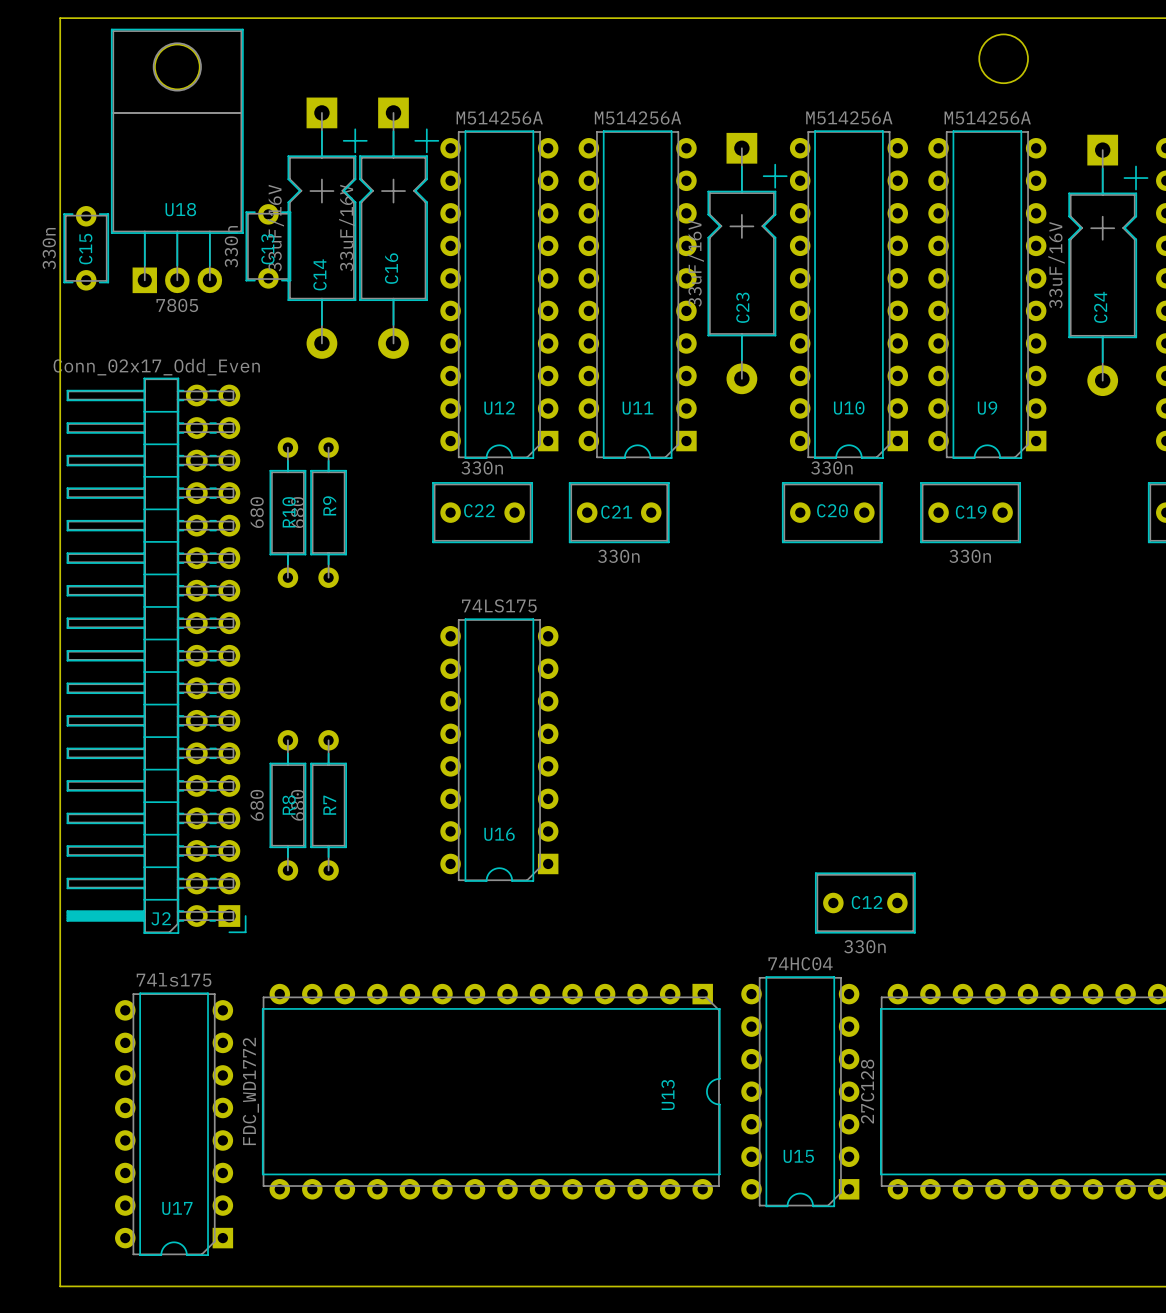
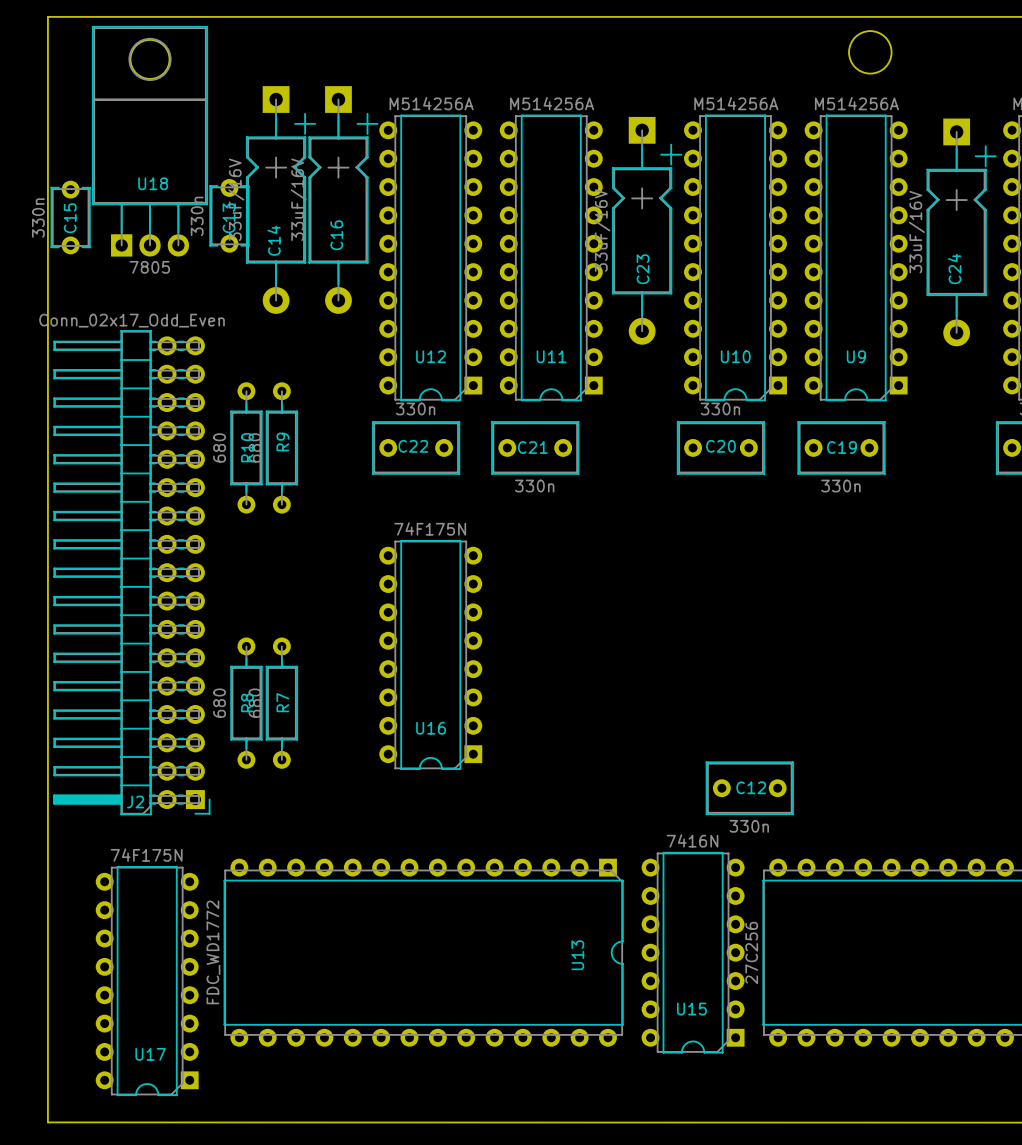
U16 value: 74LS175 (499, 605) -> 74F175N (430, 528)
U15 value: 74HC04 (800, 963) -> 7416N (692, 840)
U17 value: 74ls175 (174, 979) -> 74F175N (146, 855)
part value: 27C128 (867, 1091) -> 27C256 (751, 952)

